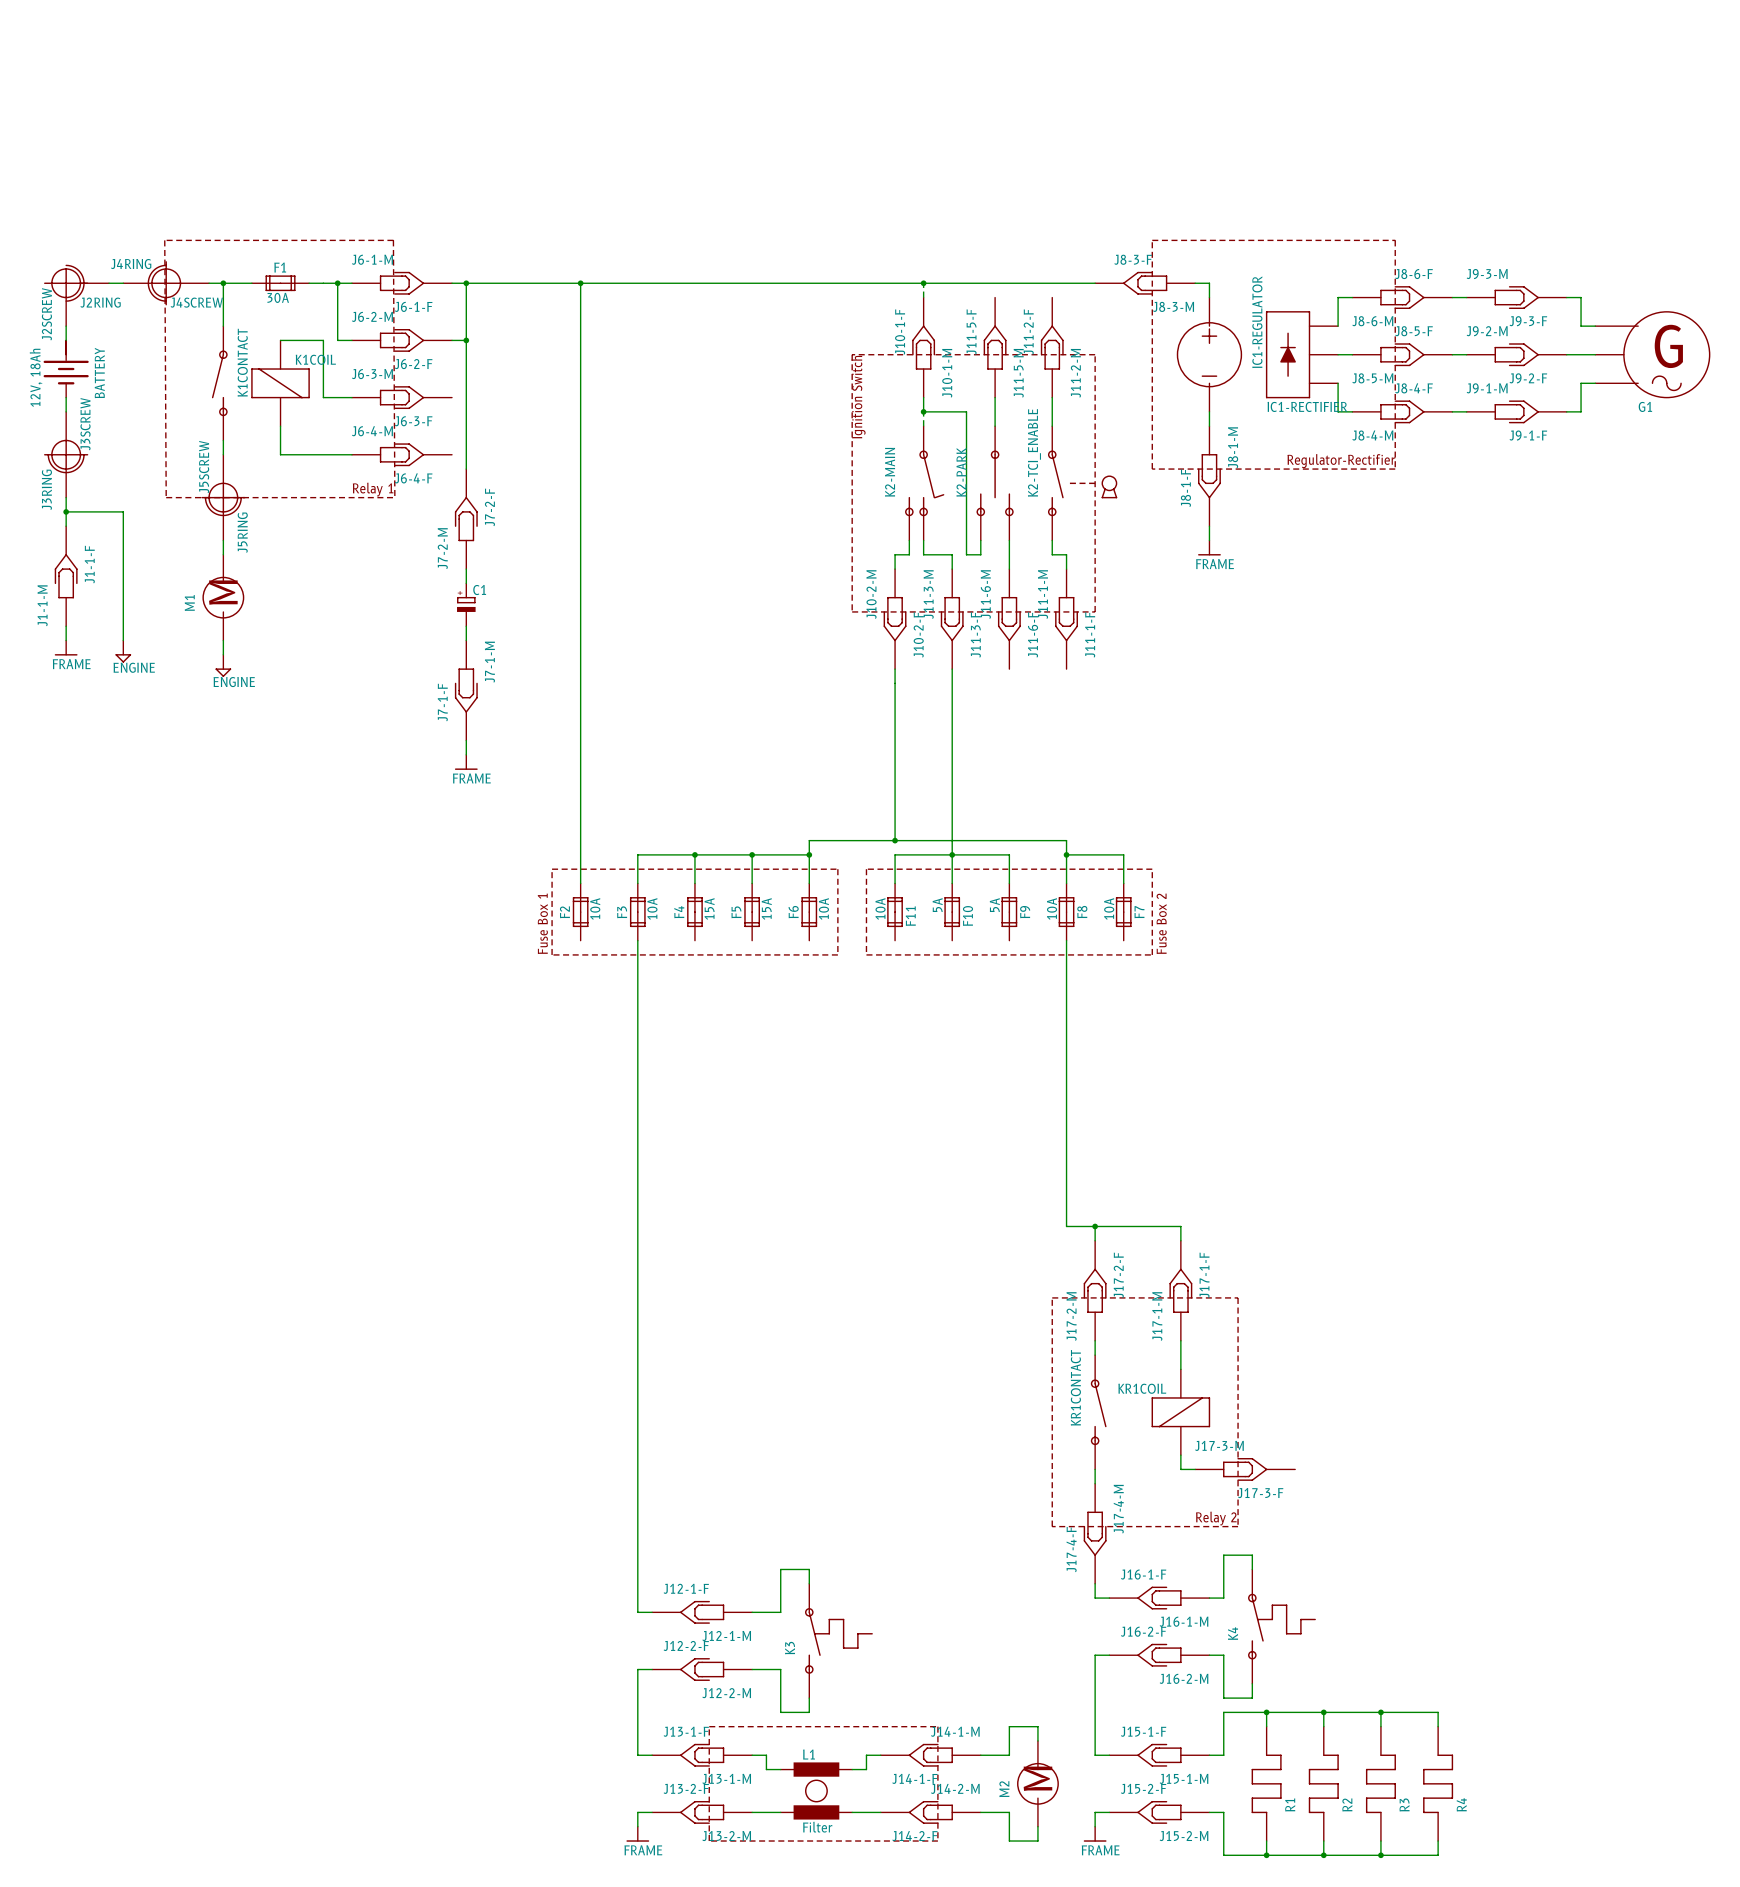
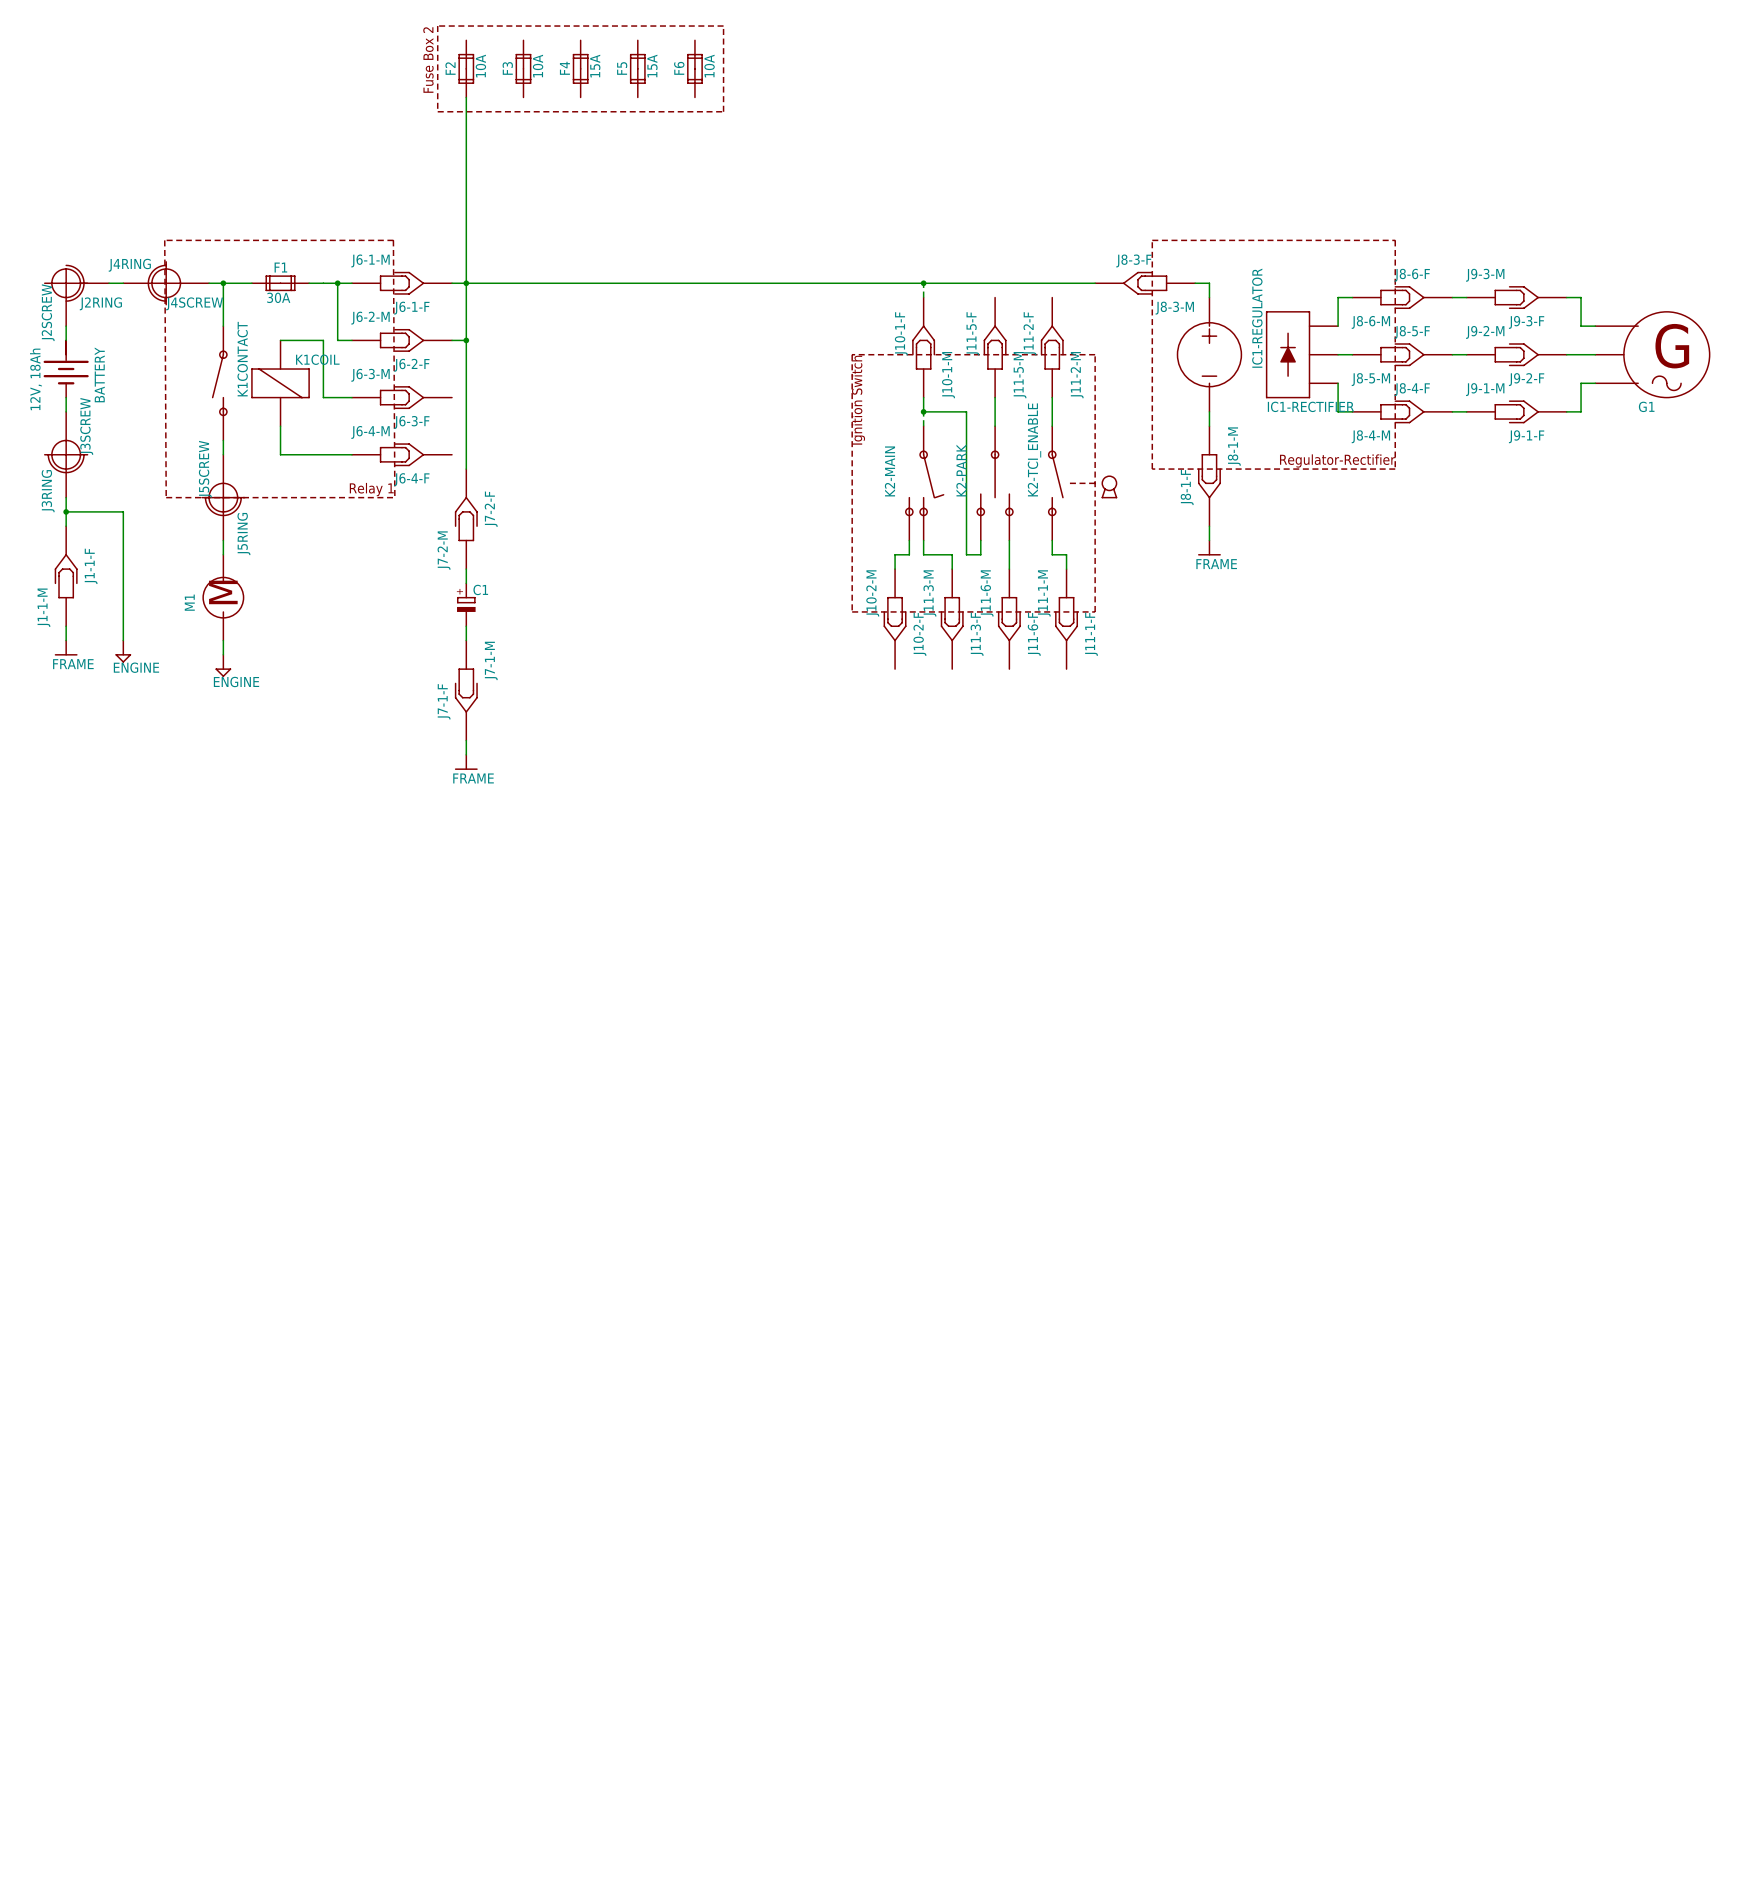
line: none -> (437, 26) (437, 111) (723, 111) (723, 26) (437, 26)
text: none -> Fuse Box 2 (428, 60)
wire: none -> (466, 97) (466, 283)
wire: (580, 283) (580, 883) -> none
junction: (580, 283) -> none
wire: (895, 669) (895, 840) -> none
wire: (952, 669) (952, 883) -> none
junction: (895, 840) -> none
wire: (694, 854) (694, 883) -> none
junction: (694, 854) -> none
wire: (752, 854) (752, 883) -> none
junction: (752, 854) -> none
wire: (809, 854) (637, 854) (637, 883) -> none
junction: (809, 854) -> none
junction: (952, 854) -> none
wire: (1066, 854) (1123, 854) (1123, 883) -> none
junction: (1066, 854) -> none
line: (552, 869) (552, 954) (837, 954) (837, 869) (552, 869) -> none
line: (866, 869) (1152, 869) (1152, 954) (866, 954) (866, 869) -> none
wire: (809, 883) (809, 840) (1066, 840) (1066, 883) -> none
wire: (895, 883) (895, 854) (1009, 854) (1009, 883) -> none
F2 name position: F2 (564, 912) -> F2 (450, 68)
F2 position: (580, 912) -> (466, 68)
F3 name position: F3 (622, 912) -> F3 (507, 68)
F3 position: (637, 912) -> (523, 68)
F4 name position: F4 (679, 912) -> F4 (564, 68)
F4 position: (694, 912) -> (580, 68)
F5 name position: F5 (736, 912) -> F5 (622, 68)
F5 position: (752, 912) -> (637, 68)
F6 name position: F6 (793, 912) -> F6 (679, 68)
F6 position: (809, 912) -> (694, 68)
F11: 10A (895, 912) -> none
F10: 5A (952, 912) -> none
F9: 5A (1009, 912) -> none
F8: 10A (1066, 912) -> none
F7: 10A (1123, 912) -> none
text: Fuse Box 1 (542, 923) -> none
text: Fuse Box 2 (1161, 923) -> none
wire: (637, 940) (637, 1612) (652, 1612) -> none
wire: (1066, 940) (1066, 1226) (1180, 1226) (1180, 1240) -> none
wire: (1095, 1226) (1095, 1240) -> none
junction: (1095, 1226) -> none
J17-2-F: (1095, 1269) -> none
J17-1-F: (1180, 1269) -> none
line: (1052, 1297) (1238, 1297) (1238, 1526) (1052, 1526) (1052, 1297) -> none
J17-2-M: (1095, 1311) -> none
J17-1-M: (1180, 1311) -> none
wire: (1095, 1340) (1095, 1355) -> none
wire: (1180, 1340) (1180, 1369) -> none
KR1CONTACT: (1098, 1412) -> none
KR1COIL: (1180, 1412) -> none
wire: (1180, 1455) (1180, 1469) (1195, 1469) -> none
wire: (1095, 1469) (1095, 1483) -> none
J17-3-M: (1224, 1469) -> none
J17-3-F: (1266, 1469) -> none
J17-4-M: (1095, 1512) -> none
text: Relay 2 (1216, 1518) -> none
J17-4-F: (1095, 1554) -> none
wire: (1252, 1569) (1252, 1555) (1223, 1555) (1223, 1598) (1209, 1598) -> none
wire: (809, 1583) (809, 1569) (780, 1569) (780, 1612) (752, 1612) -> none
wire: (1095, 1583) (1095, 1598) (1109, 1598) -> none
J16-1-F: (1138, 1598) -> none
J16-1-M: (1180, 1598) -> none
J12-1-F: (681, 1612) -> none
J12-1-M: (723, 1612) -> none
K4: (1281, 1626) -> none
K3: (838, 1640) -> none
wire: (1109, 1655) (1095, 1655) (1095, 1755) (1109, 1755) -> none
J16-2-F: (1138, 1655) -> none
J16-2-M: (1180, 1655) -> none
wire: (1209, 1655) (1223, 1655) (1223, 1698) (1252, 1698) (1252, 1683) -> none
wire: (652, 1669) (637, 1669) (637, 1755) (652, 1755) -> none
J12-2-F: (681, 1669) -> none
J12-2-M: (723, 1669) -> none
wire: (752, 1669) (780, 1669) (780, 1712) (809, 1712) (809, 1698) -> none
wire: (1266, 1712) (1266, 1726) -> none
junction: (1266, 1712) -> none
wire: (1323, 1712) (1323, 1726) -> none
junction: (1323, 1712) -> none
wire: (1380, 1712) (1380, 1726) -> none
junction: (1380, 1712) -> none
line: (709, 1726) (937, 1726) (937, 1841) (709, 1841) (709, 1726) -> none
wire: (1438, 1726) (1438, 1712) (1223, 1712) (1223, 1755) (1209, 1755) -> none
wire: (1037, 1740) (1037, 1726) (1009, 1726) (1009, 1755) (980, 1755) -> none
J13-1-F: (681, 1755) -> none
J13-1-M: (723, 1755) -> none
wire: (752, 1755) (766, 1755) (766, 1769) (780, 1769) -> none
wire: (880, 1755) (866, 1755) (866, 1769) (852, 1769) -> none
J14-1-F: (909, 1755) -> none
J14-1-M: (951, 1755) -> none
J15-1-F: (1138, 1755) -> none
J15-1-M: (1180, 1755) -> none
M2: (1037, 1783) -> none
R1: (1266, 1783) -> none
R2: (1323, 1783) -> none
R3: (1380, 1783) -> none
R4: (1438, 1783) -> none
L1: Filter (816, 1790) -> none
wire: (652, 1812) (637, 1812) (637, 1826) -> none
J13-2-F: (681, 1812) -> none
J13-2-M: (723, 1812) -> none
wire: (752, 1812) (780, 1812) -> none
wire: (852, 1812) (880, 1812) -> none
J14-2-F: (909, 1812) -> none
J14-2-M: (951, 1812) -> none
wire: (980, 1812) (1009, 1812) (1009, 1841) (1037, 1841) (1037, 1826) -> none
wire: (1109, 1812) (1095, 1812) (1095, 1826) -> none
J15-2-F: (1138, 1812) -> none
J15-2-M: (1180, 1812) -> none
wire: (1209, 1812) (1223, 1812) (1223, 1855) (1438, 1855) (1438, 1841) -> none
power symbol: FRAME (637, 1834) -> none
power symbol: FRAME (1095, 1834) -> none
wire: (1266, 1841) (1266, 1855) -> none
wire: (1323, 1841) (1323, 1855) -> none
wire: (1380, 1841) (1380, 1855) -> none
junction: (1266, 1855) -> none
junction: (1323, 1855) -> none
junction: (1380, 1855) -> none

